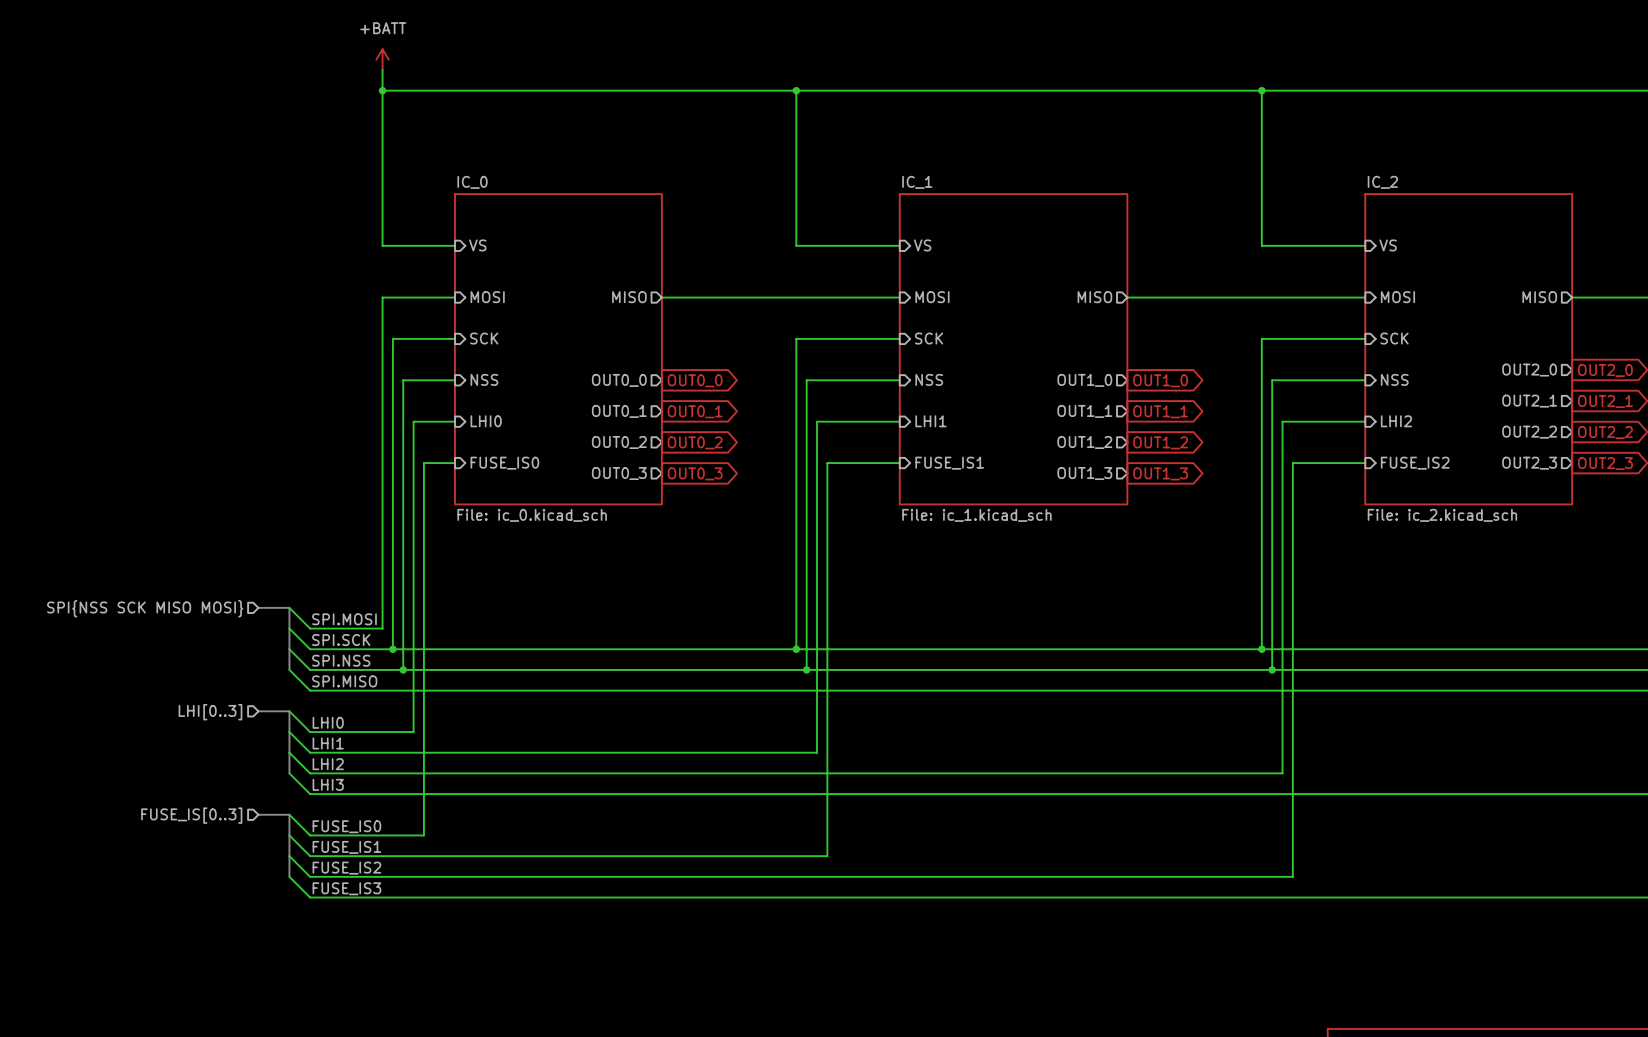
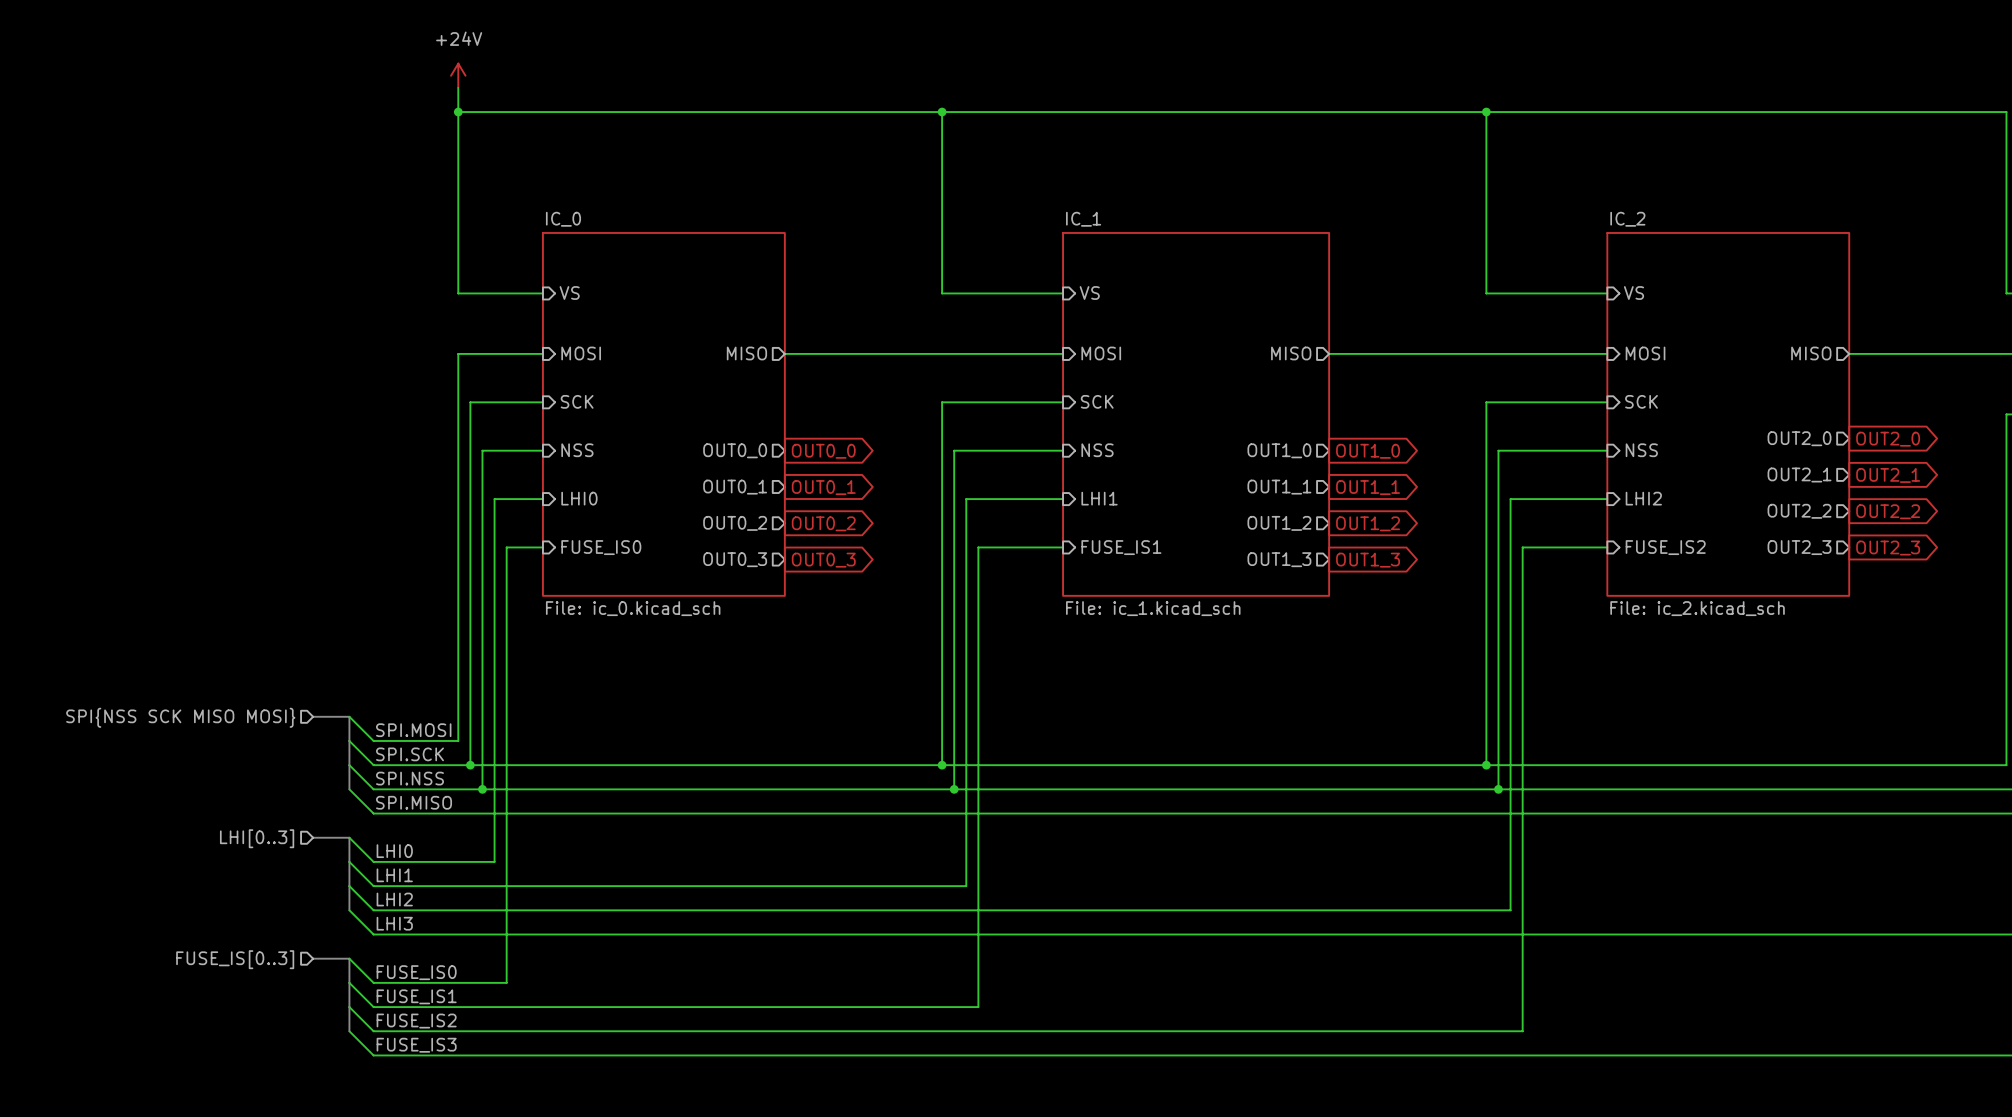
power symbol: +BATT (382, 59) -> +24V (458, 75)

